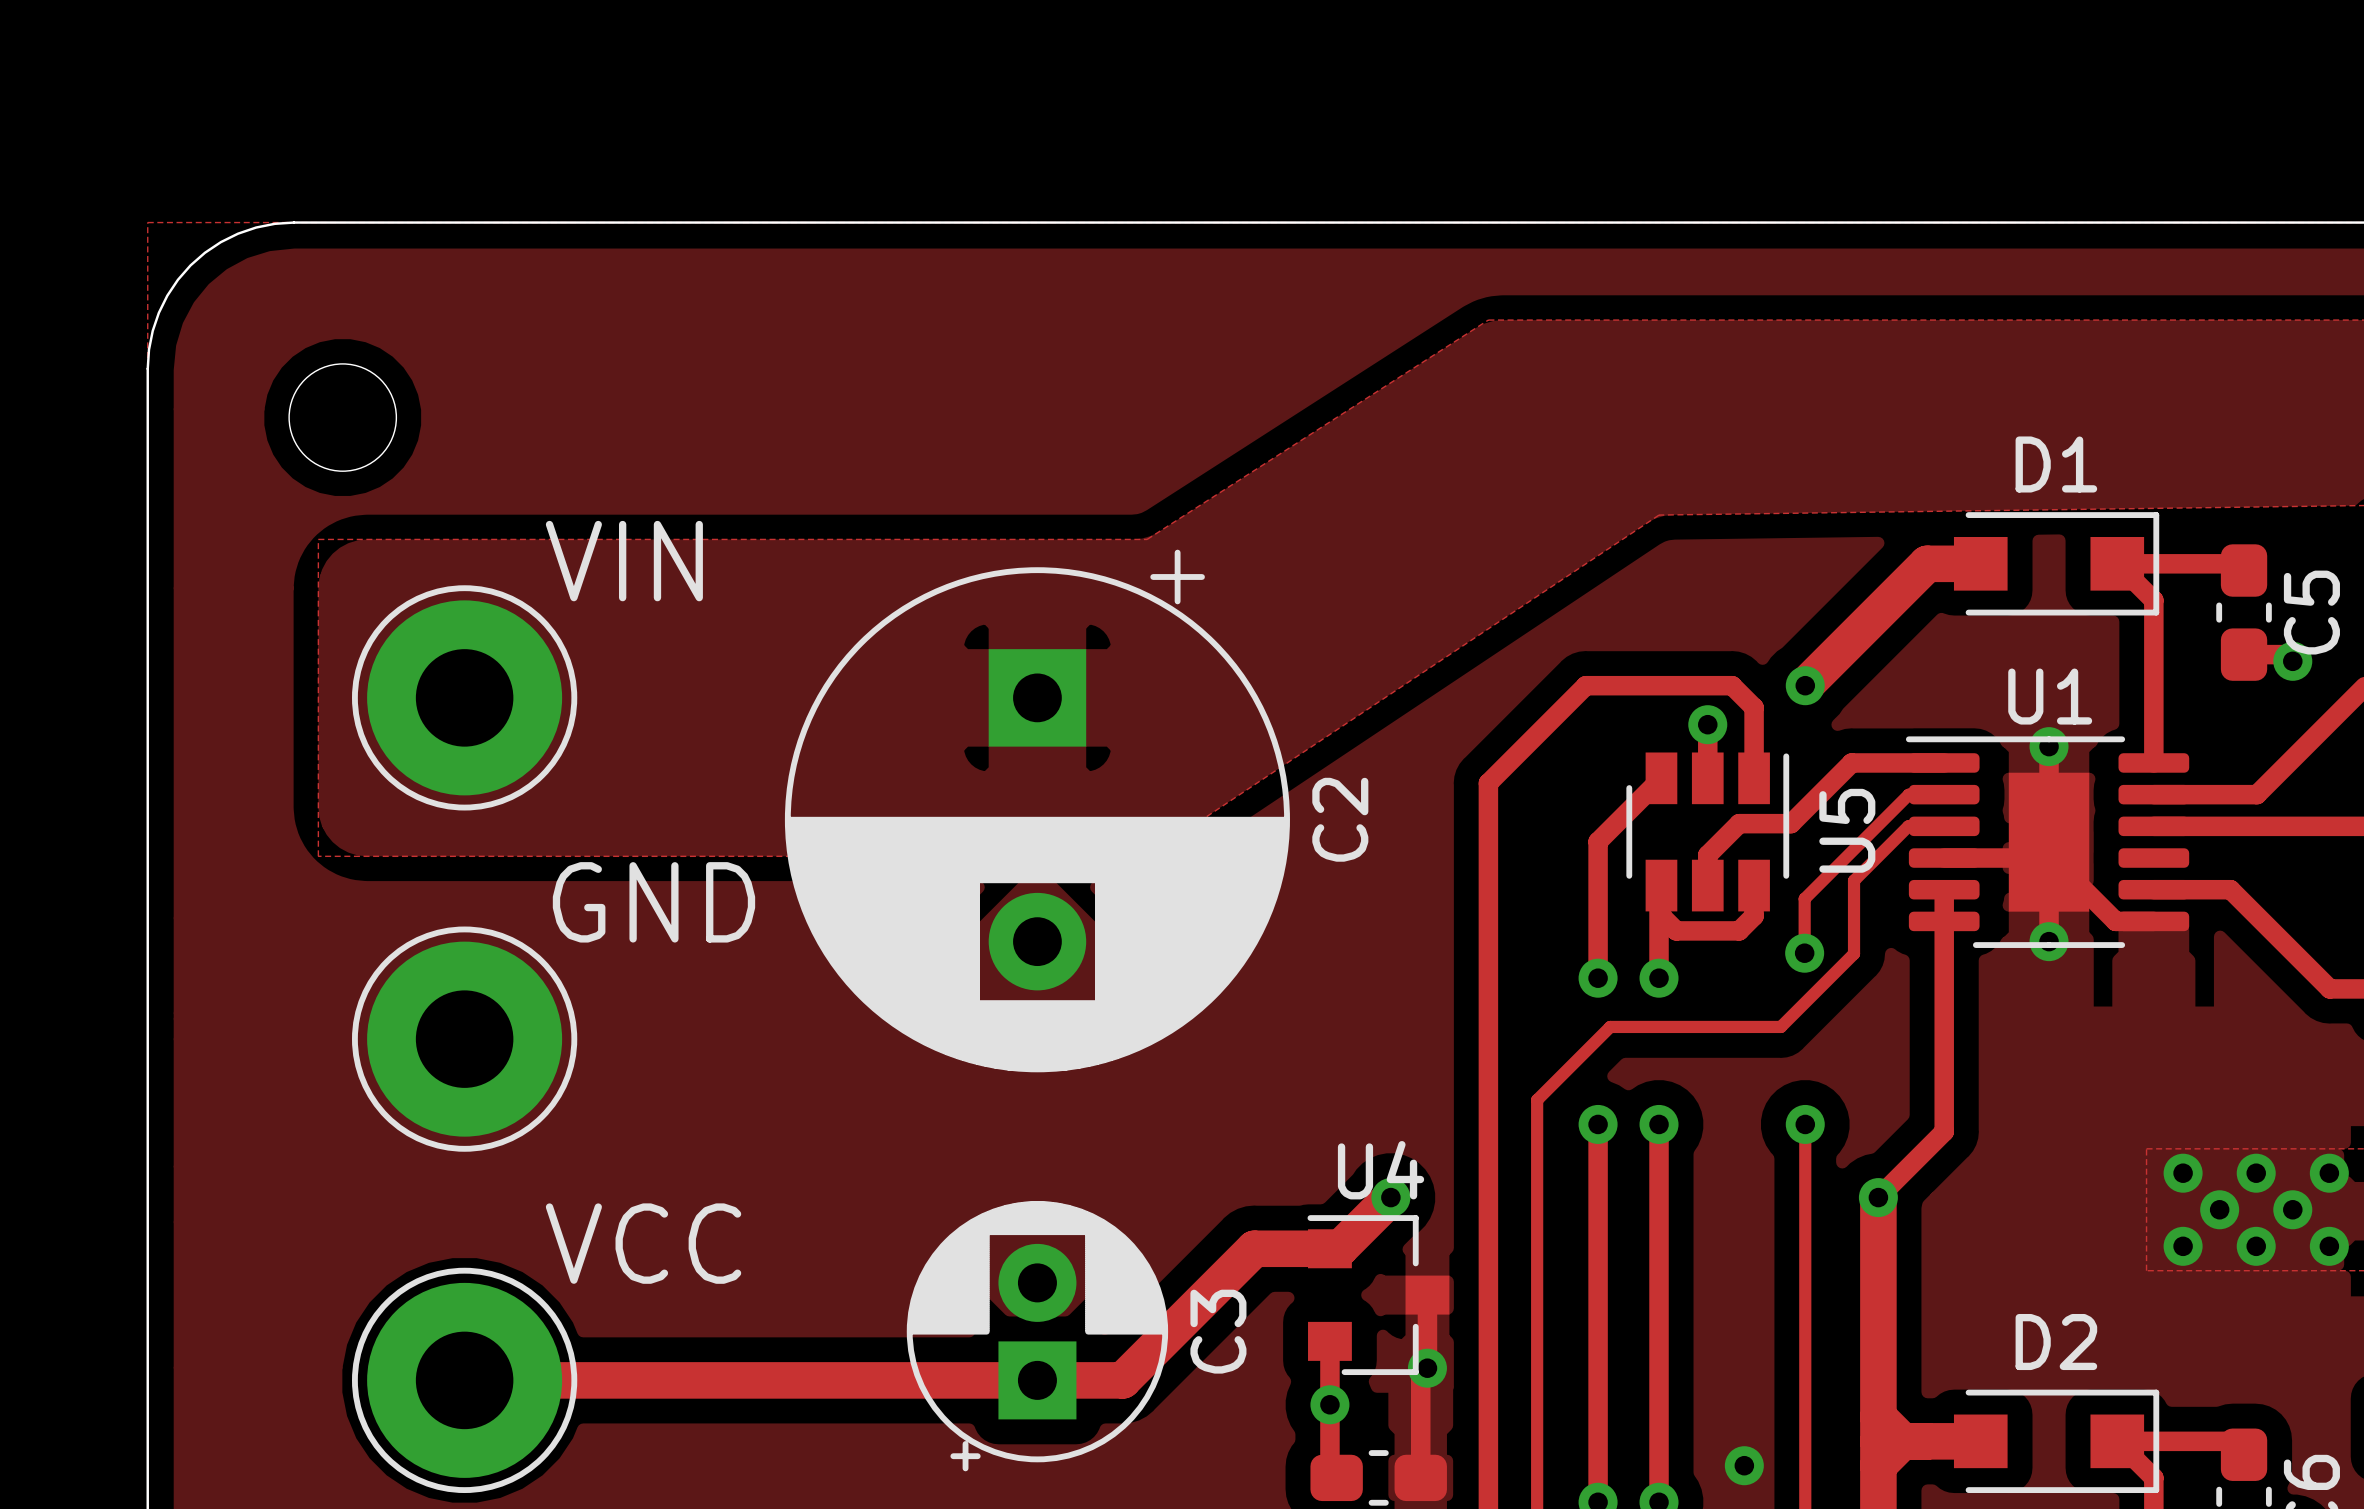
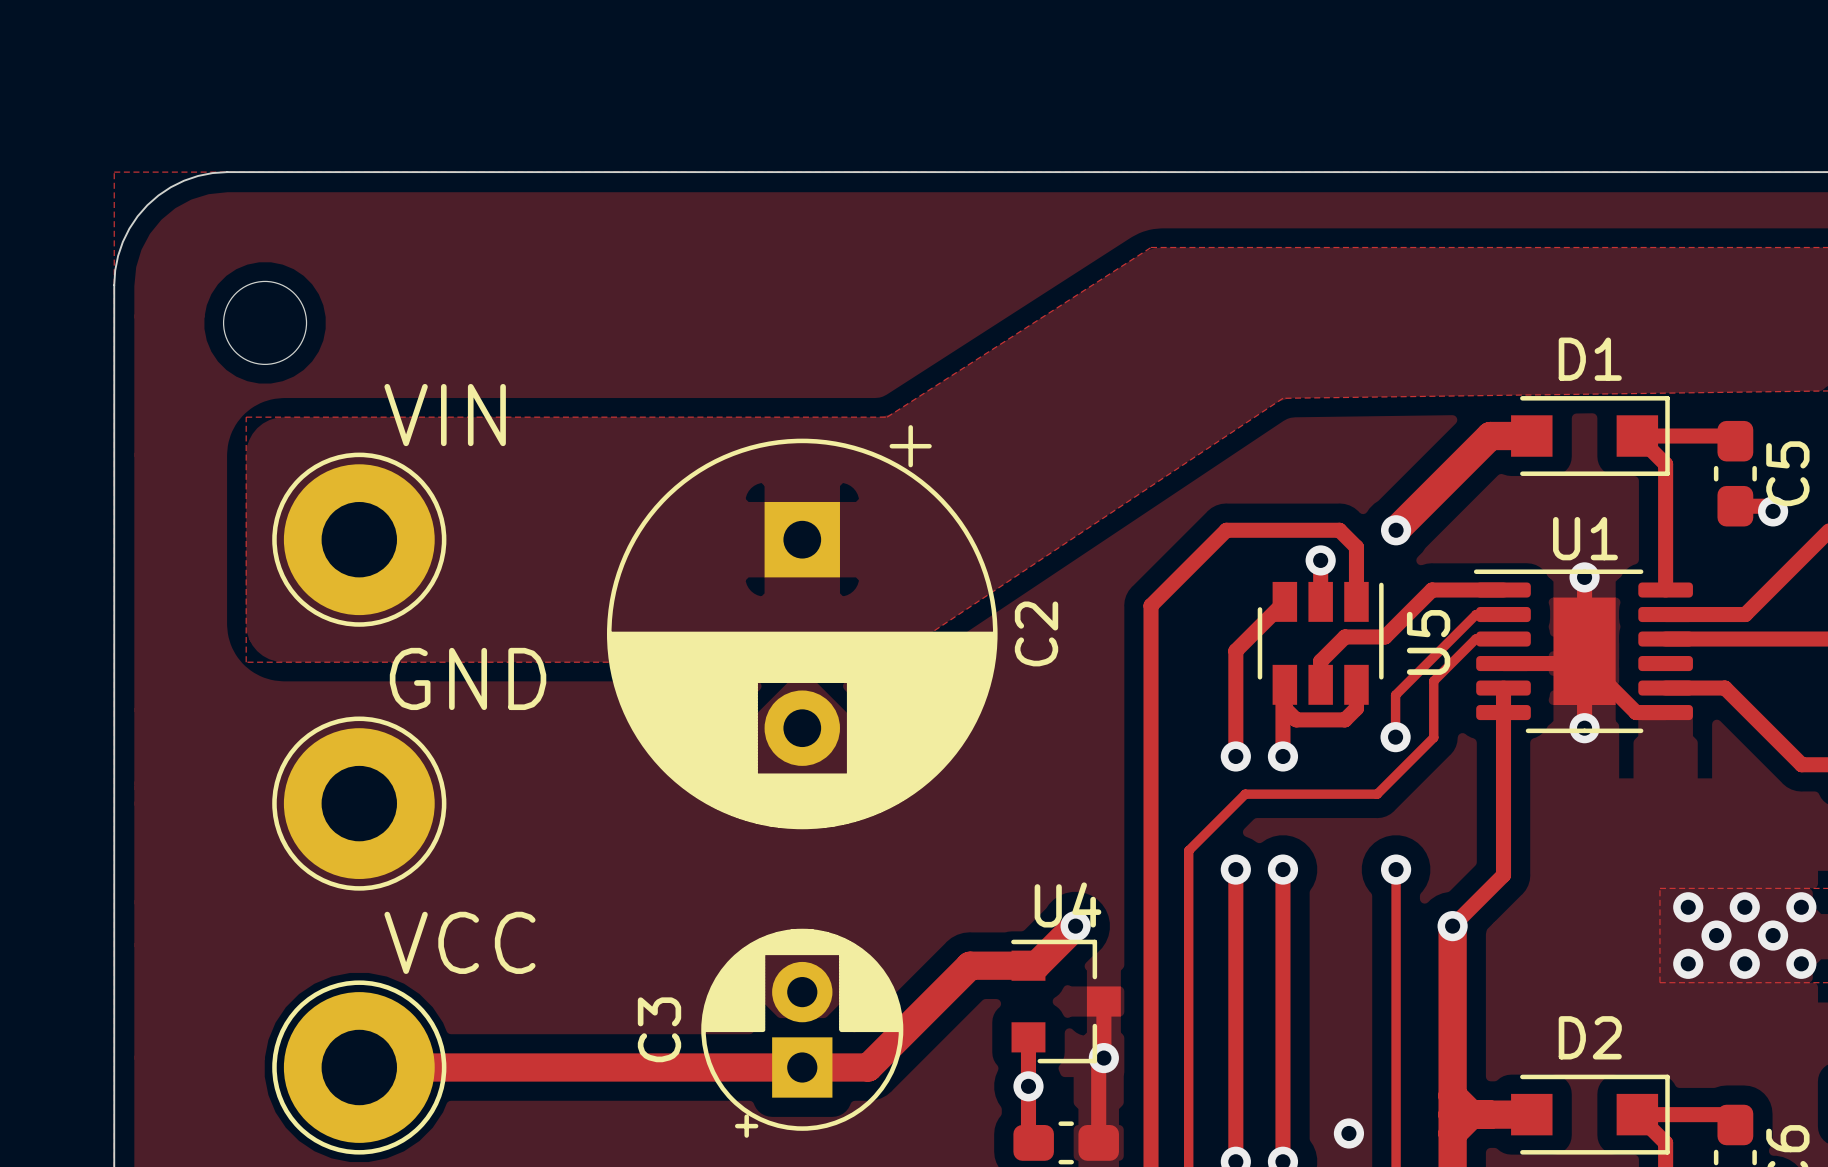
text position: VIN (624, 561) -> VIN (445, 415)
text position: GND (653, 902) -> GND (468, 678)
text position: VCC (643, 1243) -> VCC (459, 942)
C3 name position: C3 (1218, 1331) -> C3 (659, 1029)

